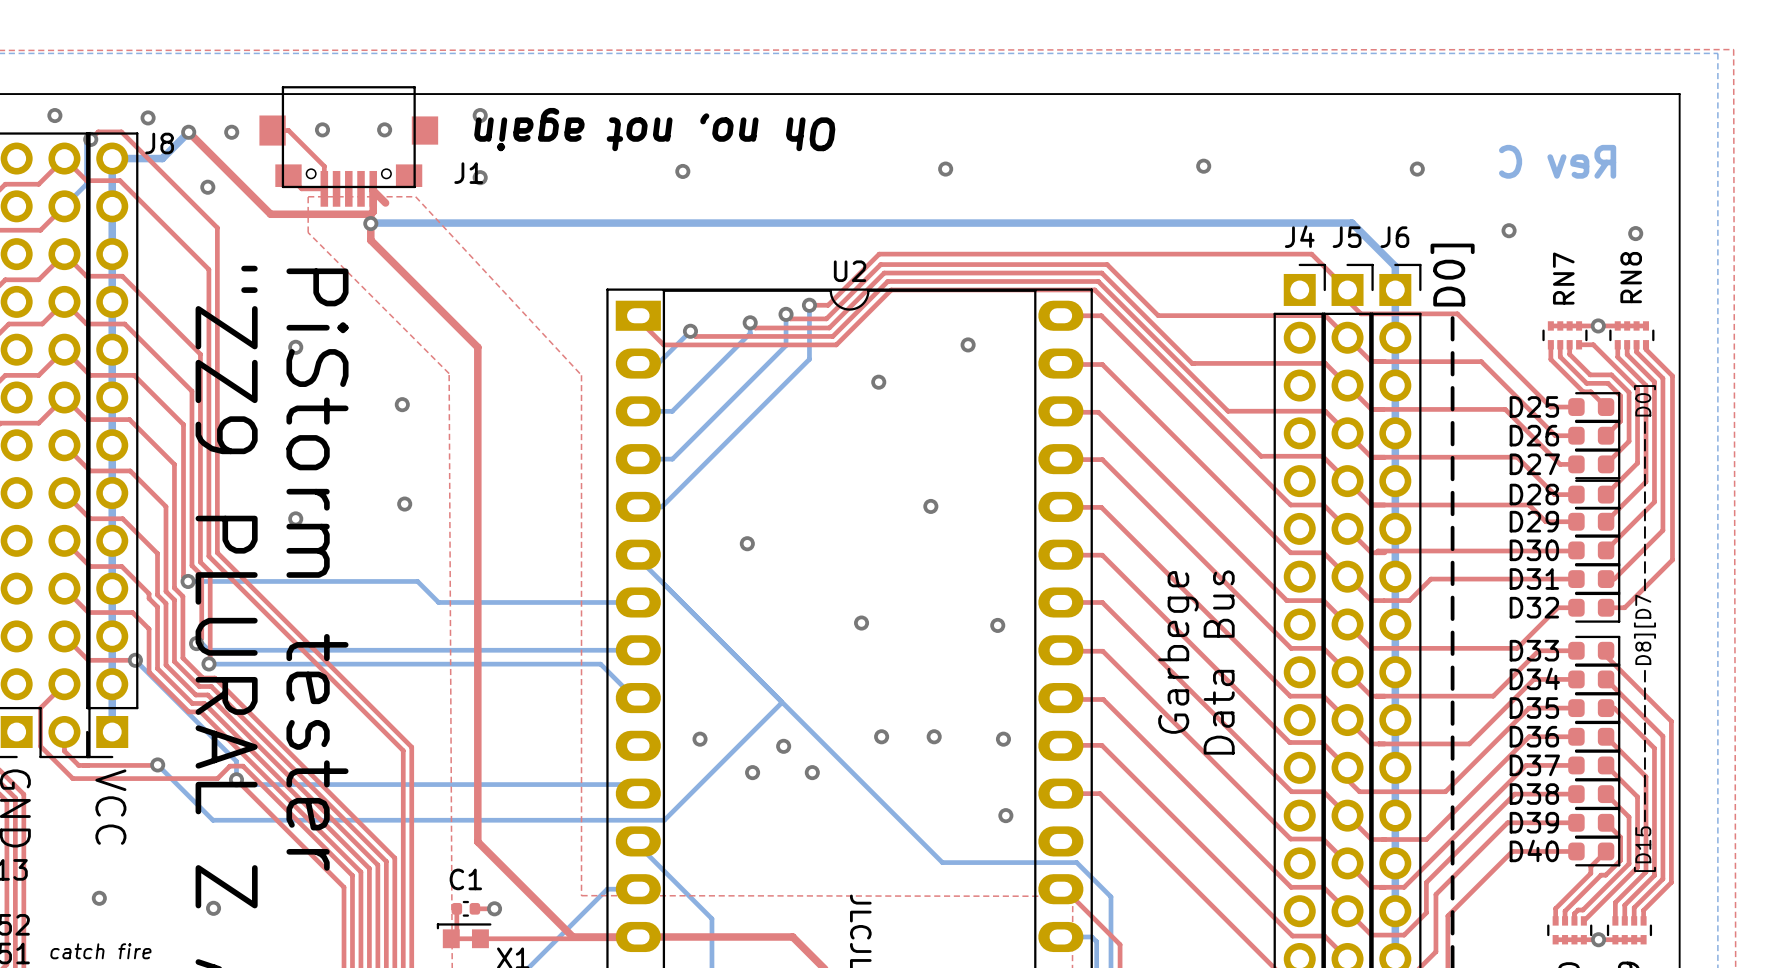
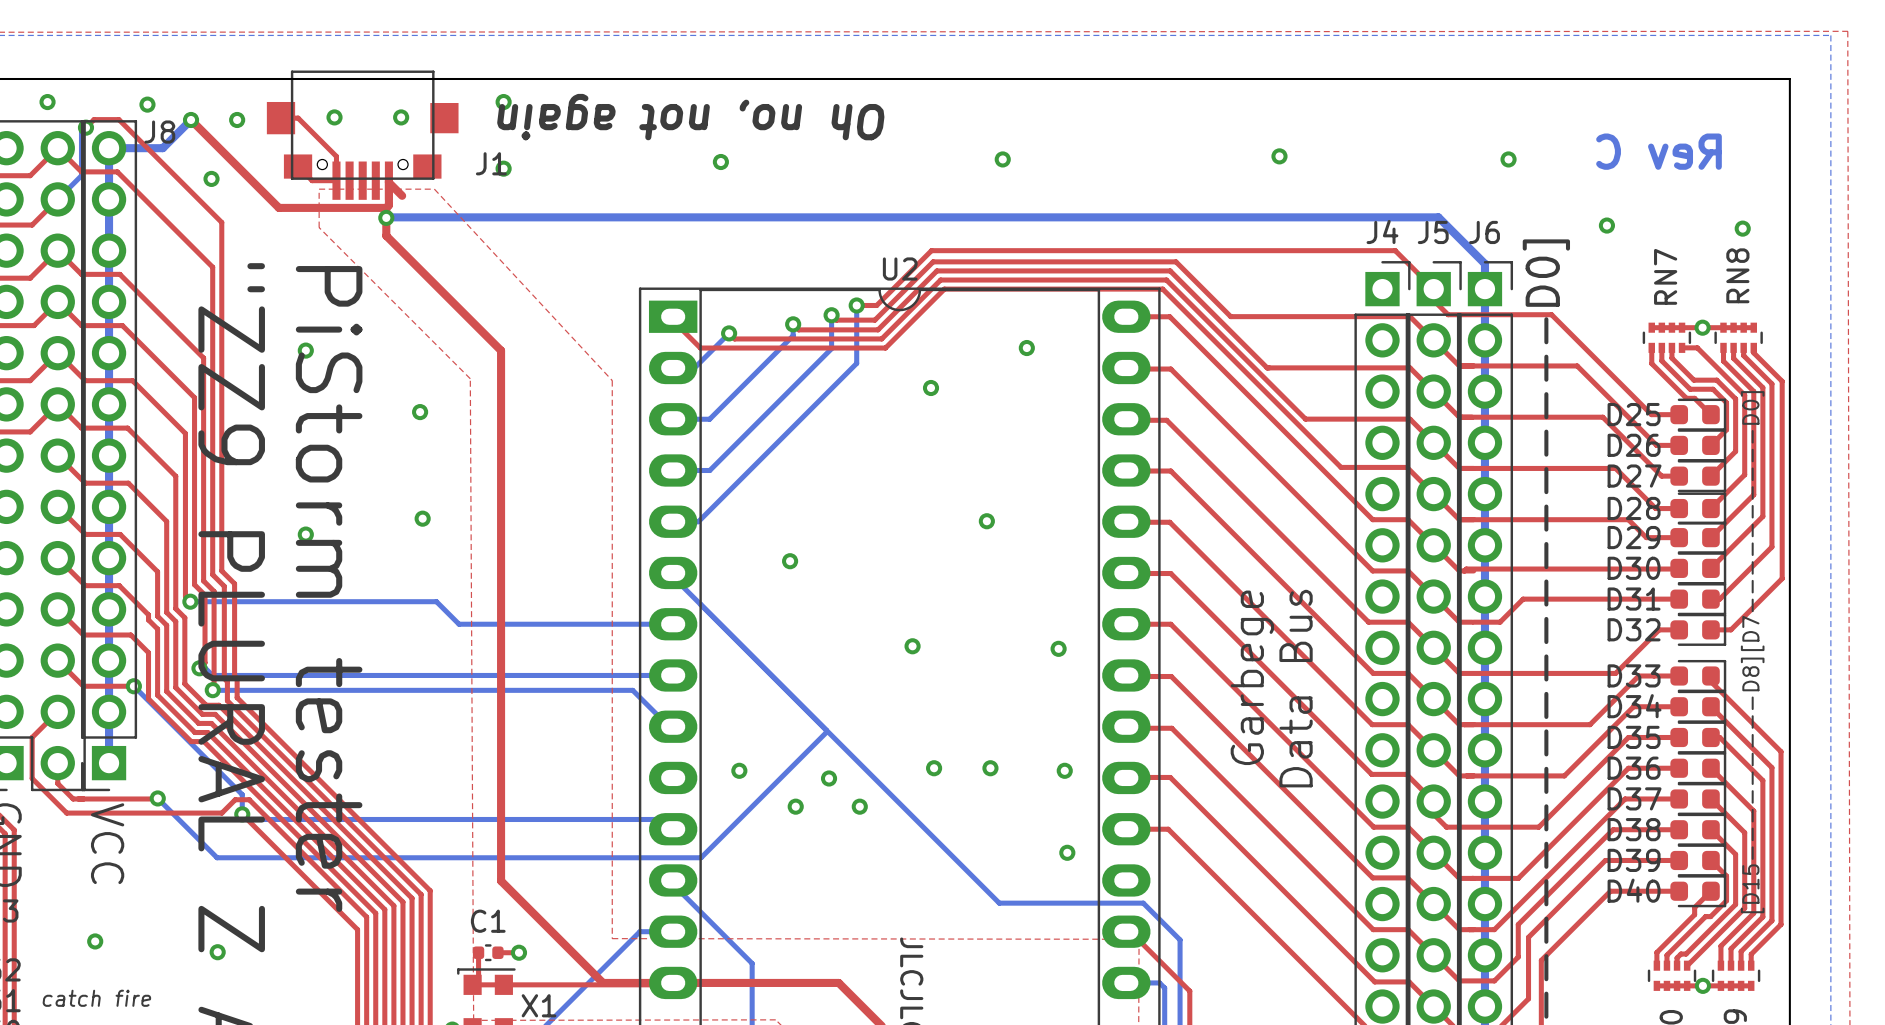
top track: (229, 564) (411, 747) (411, 851) -> (234, 583) (234, 676) (237, 678) (237, 697) (430, 890)
top track: (219, 567) (403, 750) (403, 854) -> (224, 586) (224, 678) (227, 681) (227, 700) (421, 894)

